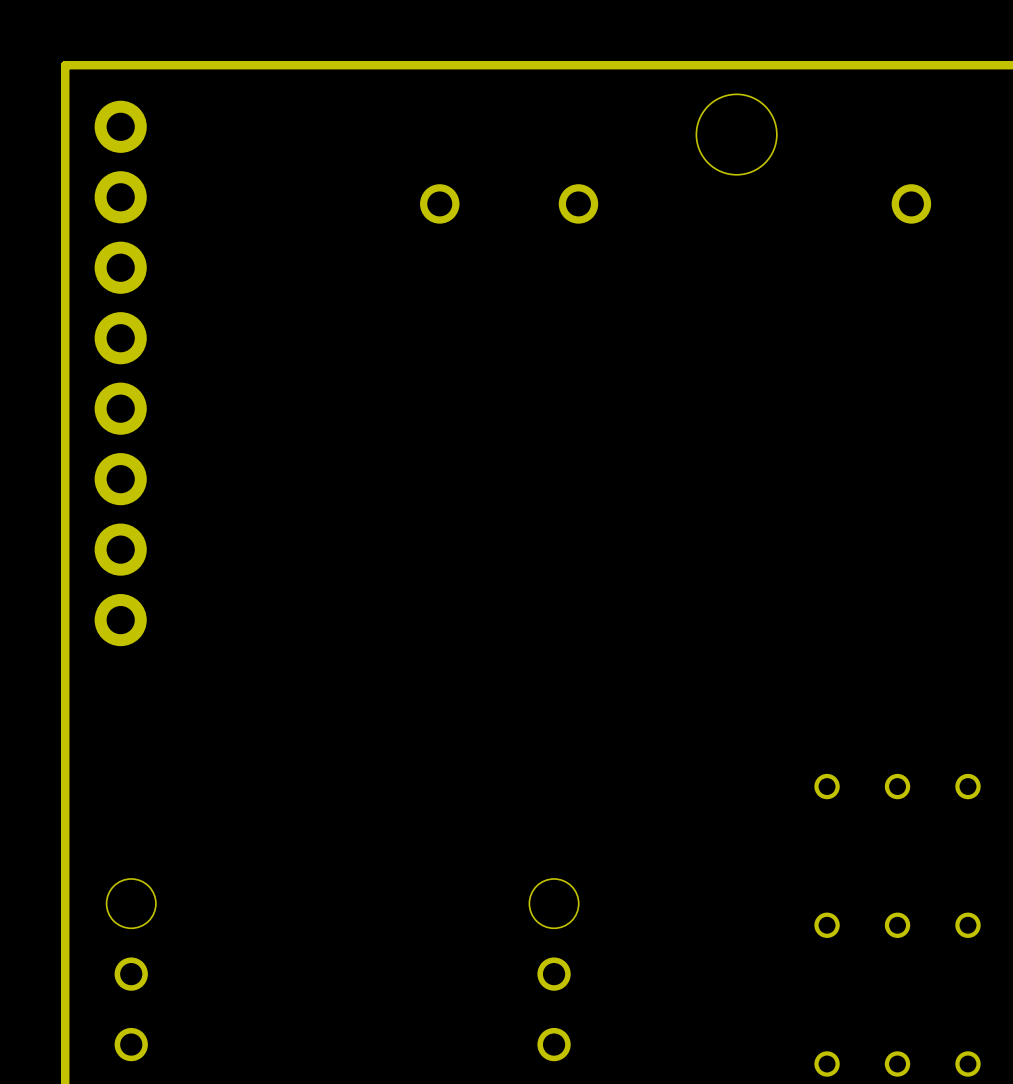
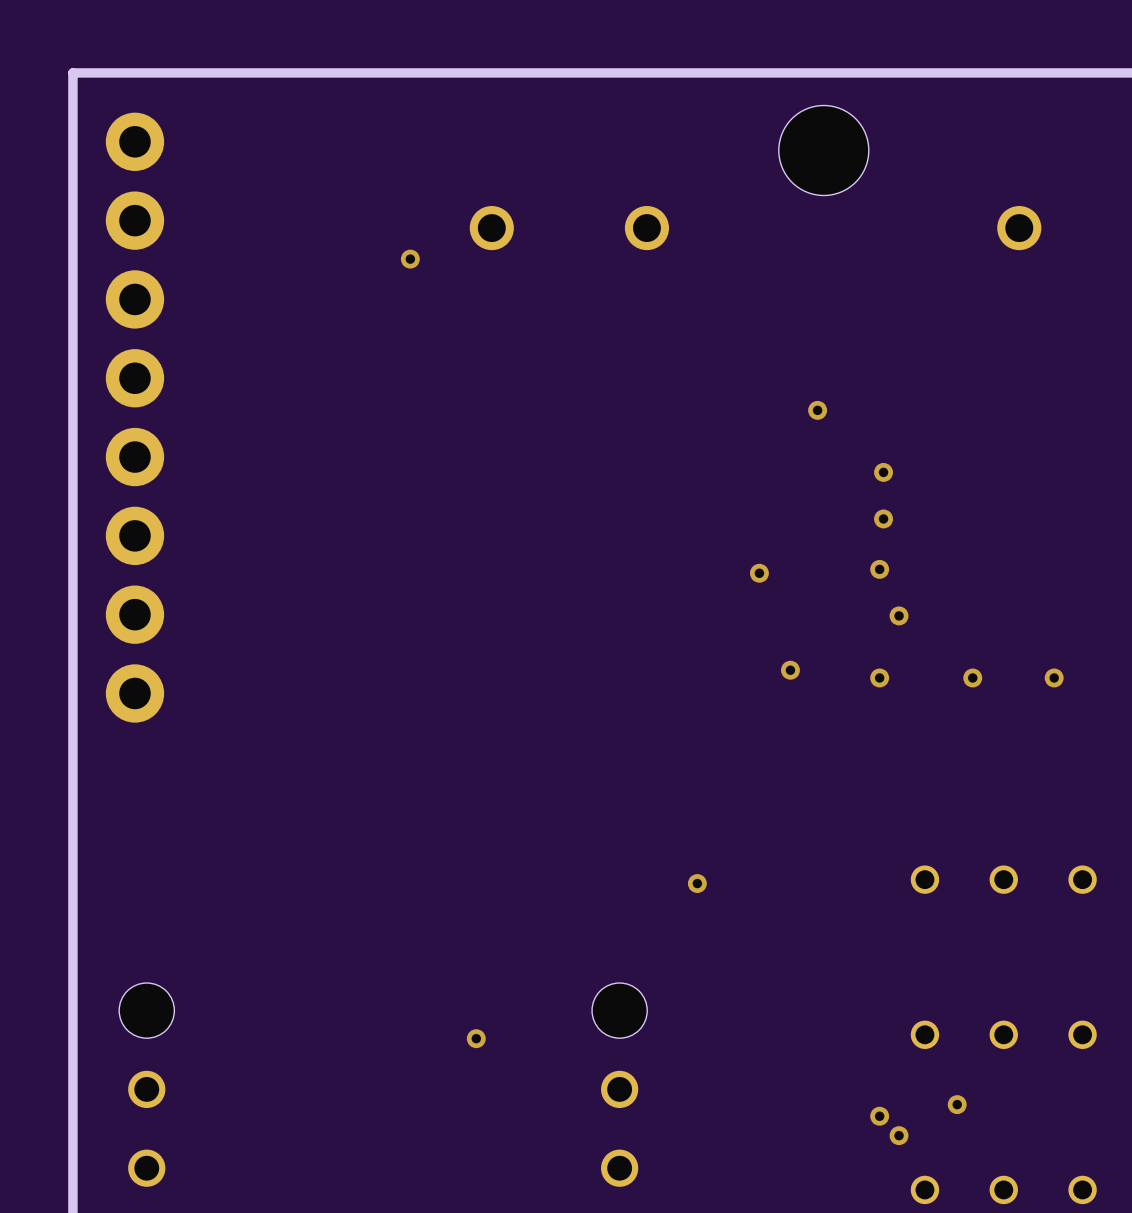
via: none -> (410, 259)
via: none -> (817, 410)
via: none -> (883, 472)
via: none -> (883, 518)
via: none -> (879, 569)
via: none -> (759, 573)
via: none -> (899, 615)
via: none -> (790, 670)
via: none -> (879, 677)
via: none -> (972, 677)
via: none -> (1054, 677)
via: none -> (697, 883)
via: none -> (476, 1038)
via: none -> (957, 1104)
via: none -> (879, 1116)
via: none -> (899, 1135)

